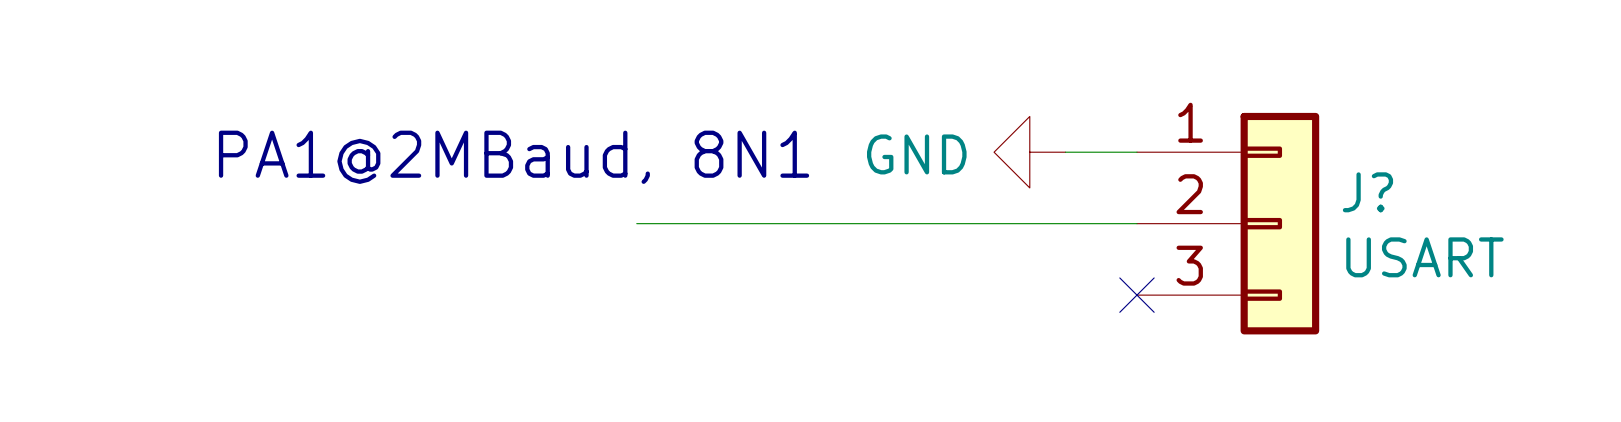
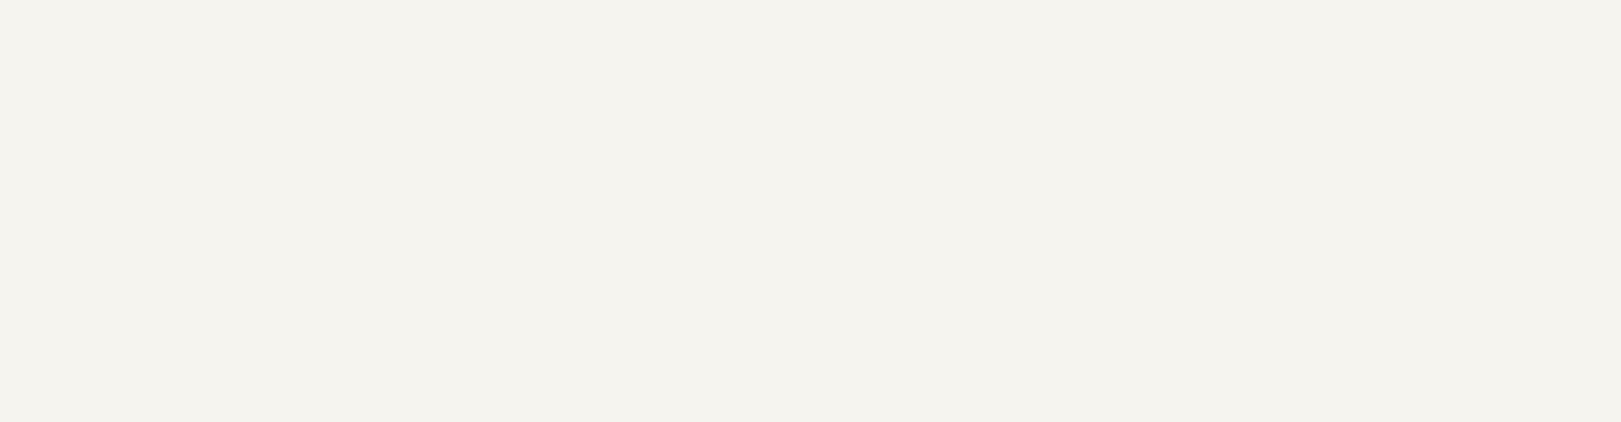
power symbol: GND (1029, 152) -> none
wire: (1065, 152) (1136, 152) -> none
text: PA1@2MBaud, 8N1 (514, 157) -> none
wire: (636, 223) (1136, 223) -> none
J?: USART (1228, 223) -> none
no-connect mark: (1136, 295) -> none

